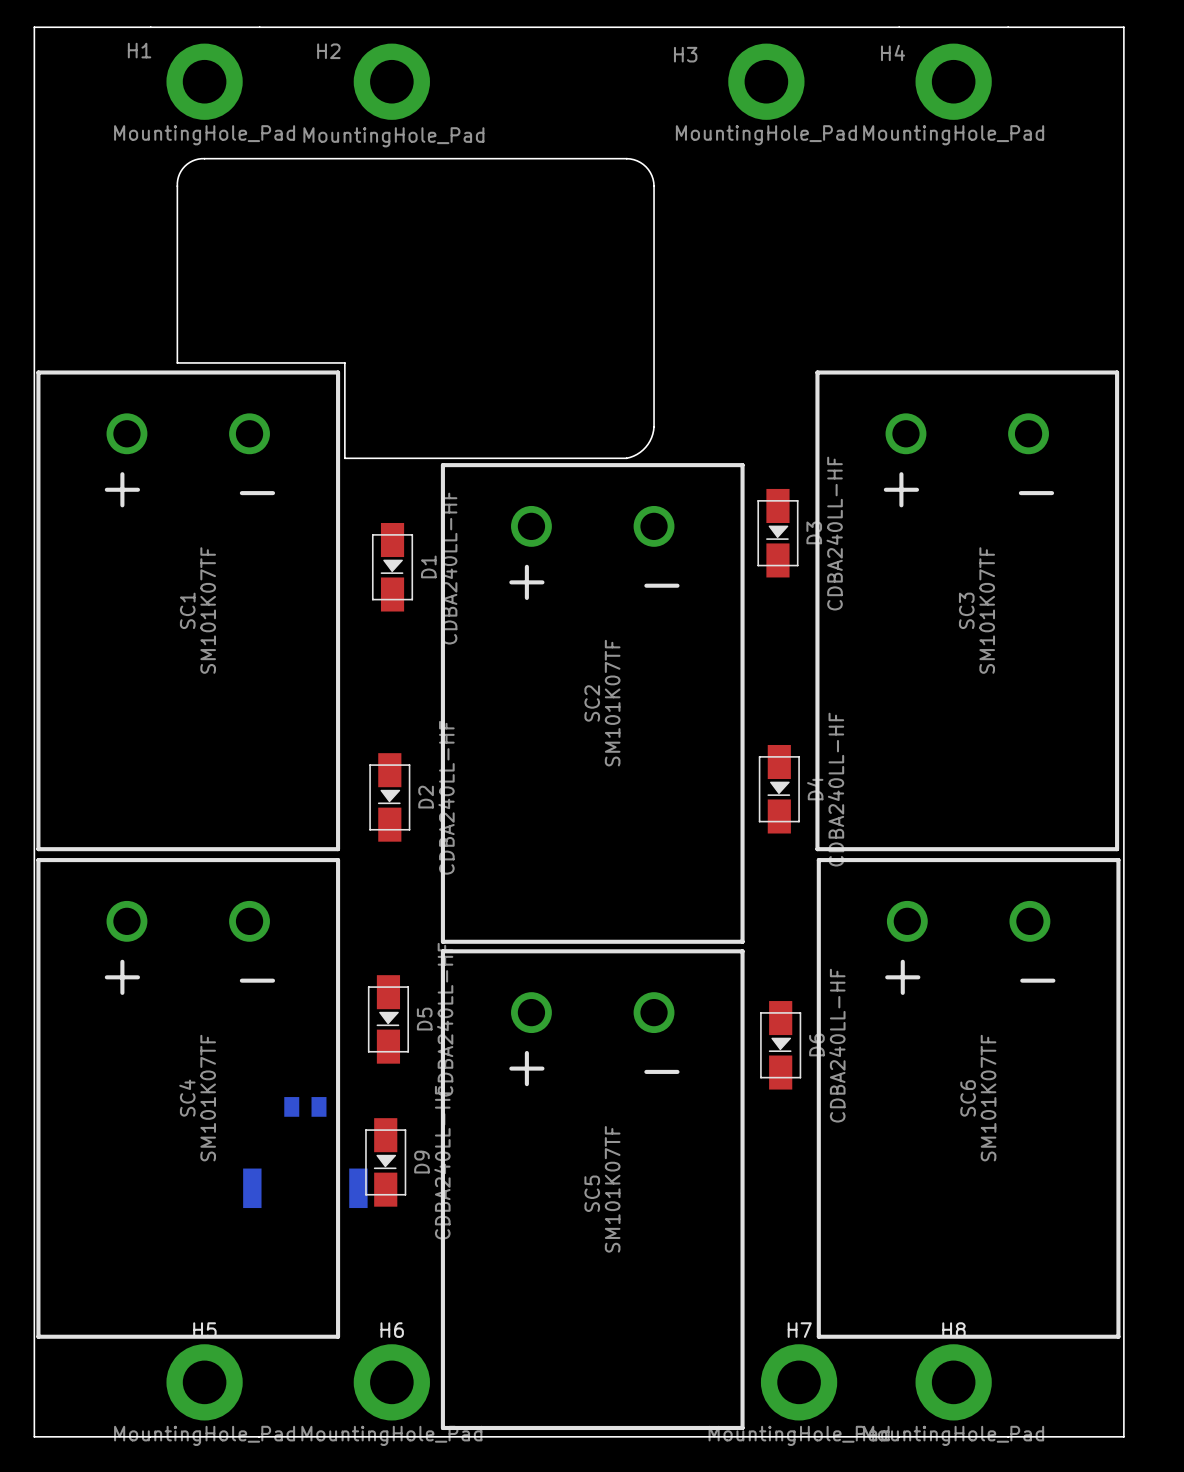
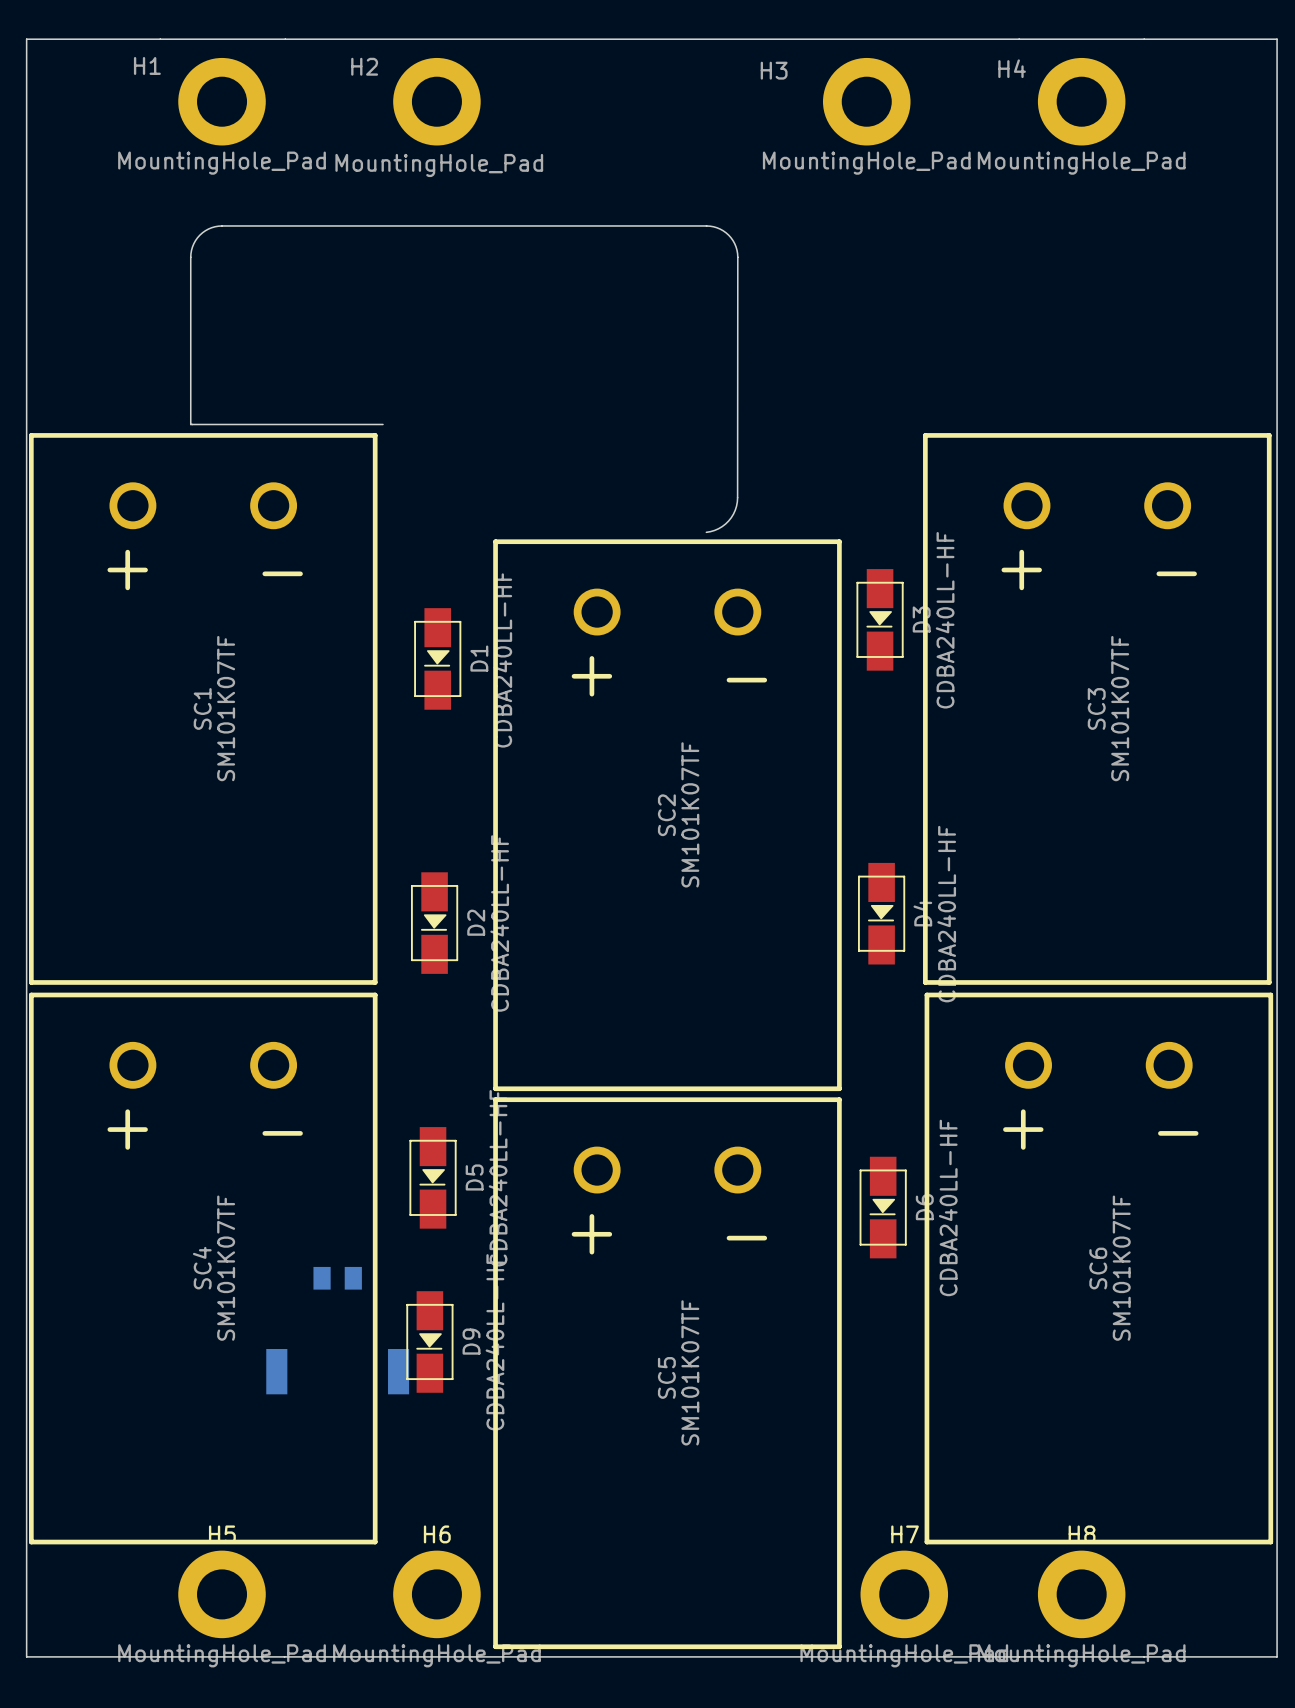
board edge: (177, 217) (177, 183) (179, 173) (189, 162) (201, 158) (626, 158) (640, 162) (650, 172) (654, 186) (654, 426) (648, 444) (637, 454) (626, 458) (344, 458) (344, 362) -> (190, 257) (192, 246) (199, 235) (208, 229) (222, 225) (706, 225) (720, 229) (733, 240) (737, 253) (737, 497) (735, 510) (728, 521) (718, 528) (706, 532)

